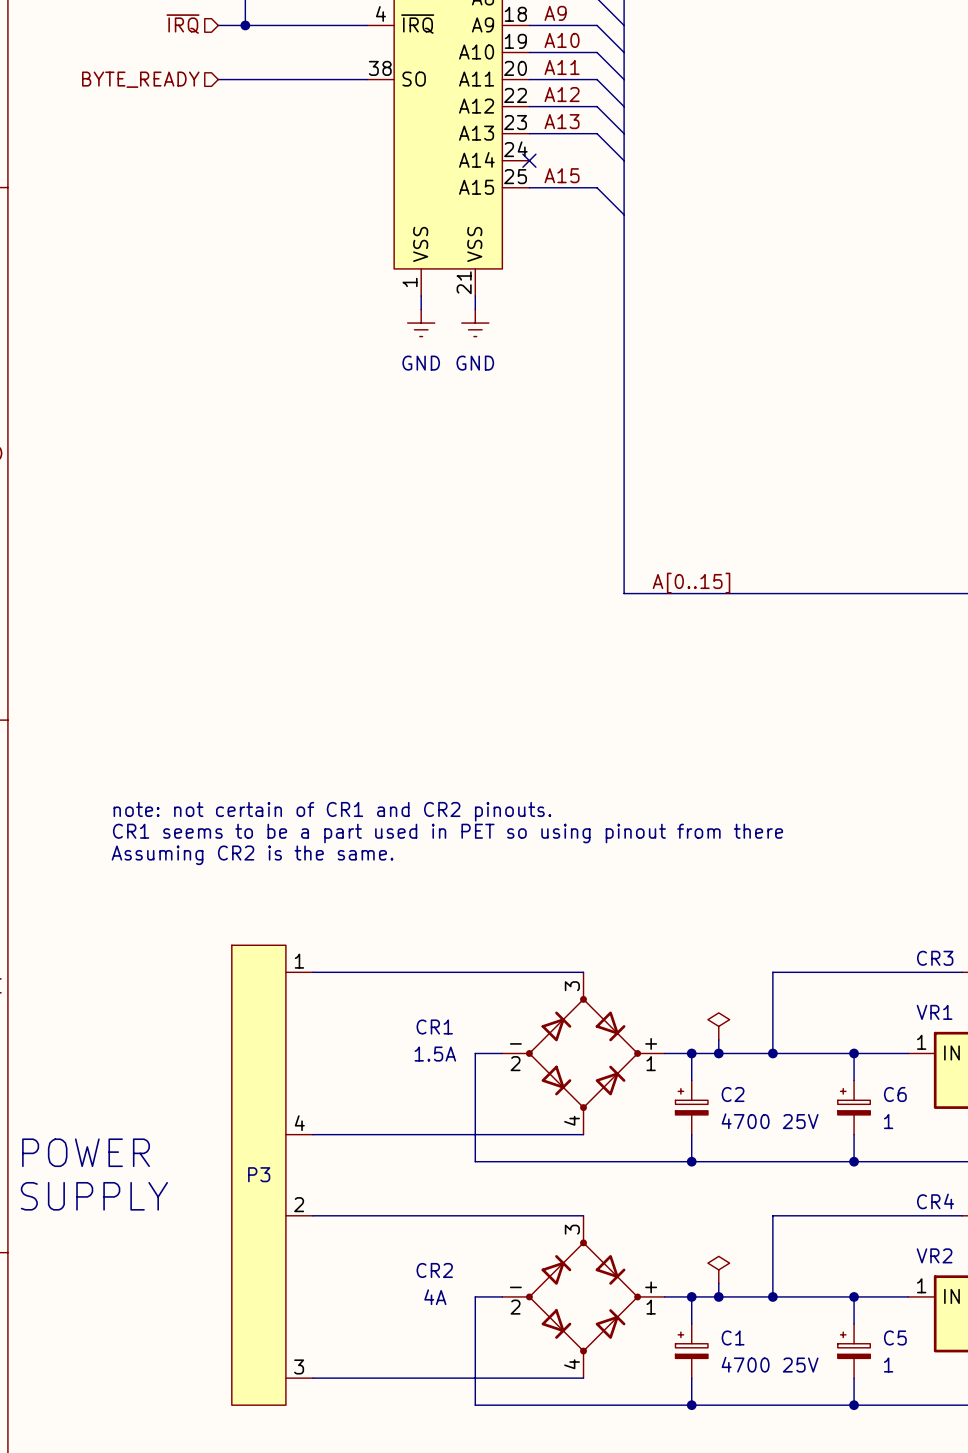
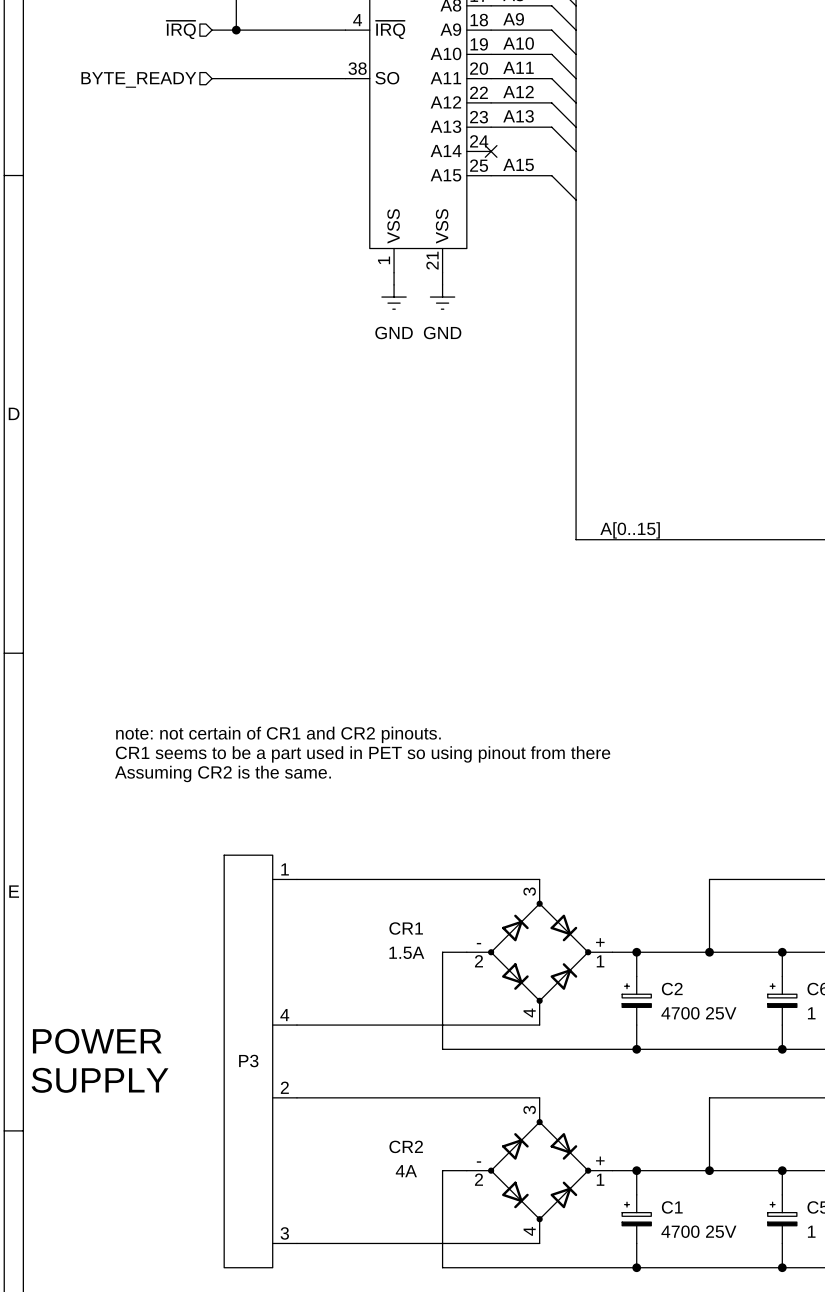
power symbol: (718, 1026) -> none
wire: (718, 1039) (718, 1053) -> none
junction: (718, 1053) -> none
power symbol: (718, 1269) -> none
wire: (718, 1283) (718, 1296) -> none
junction: (718, 1296) -> none

